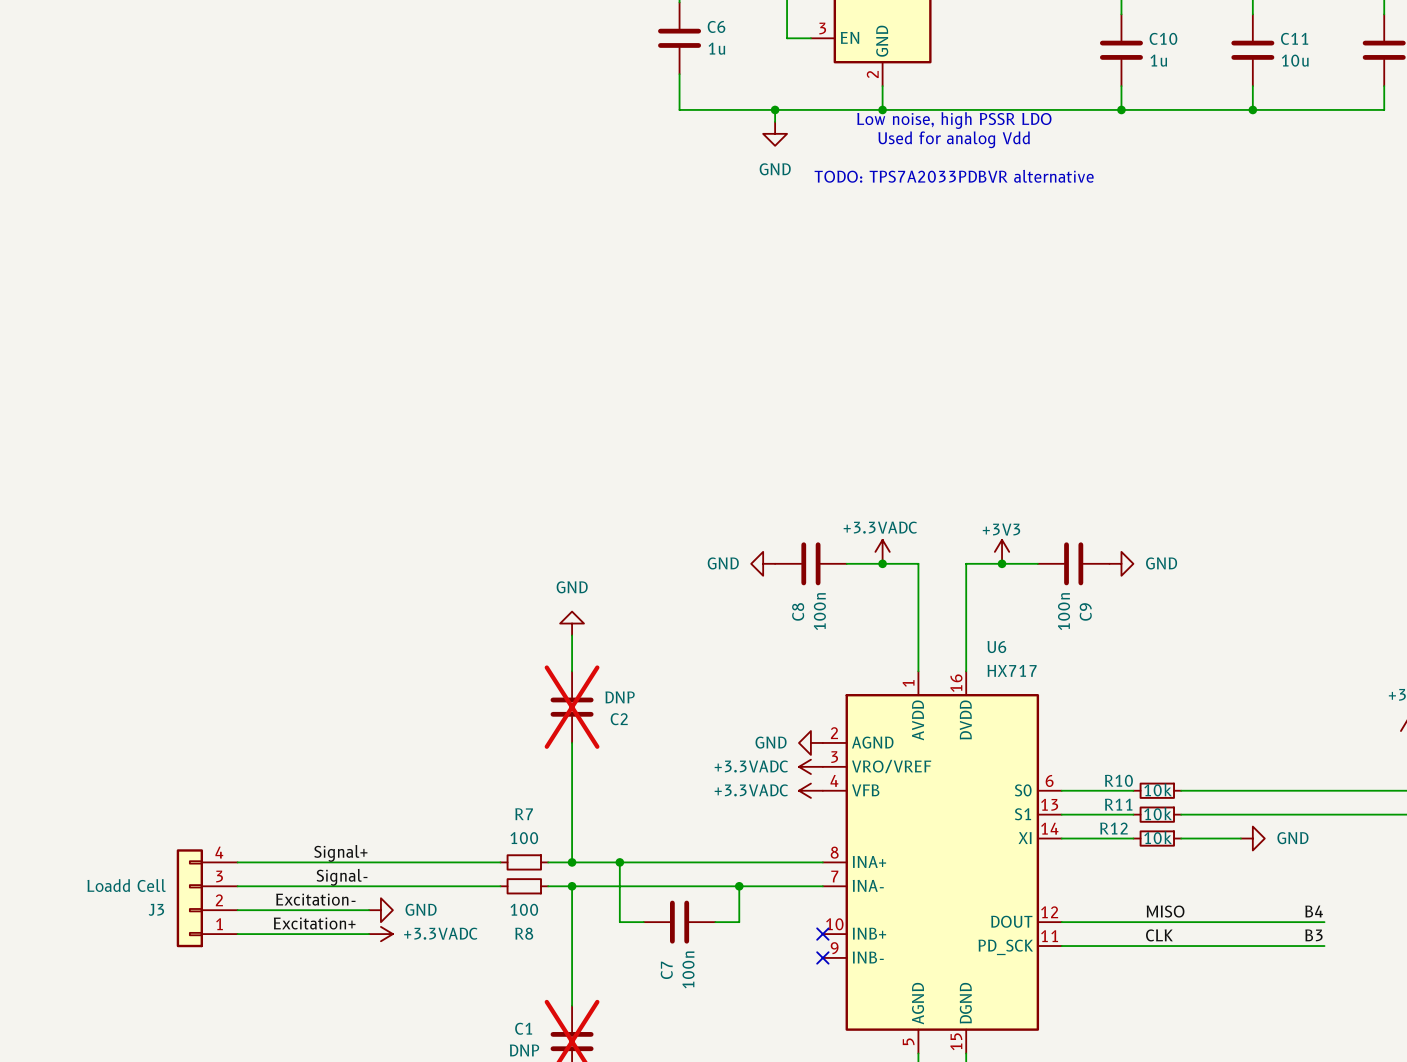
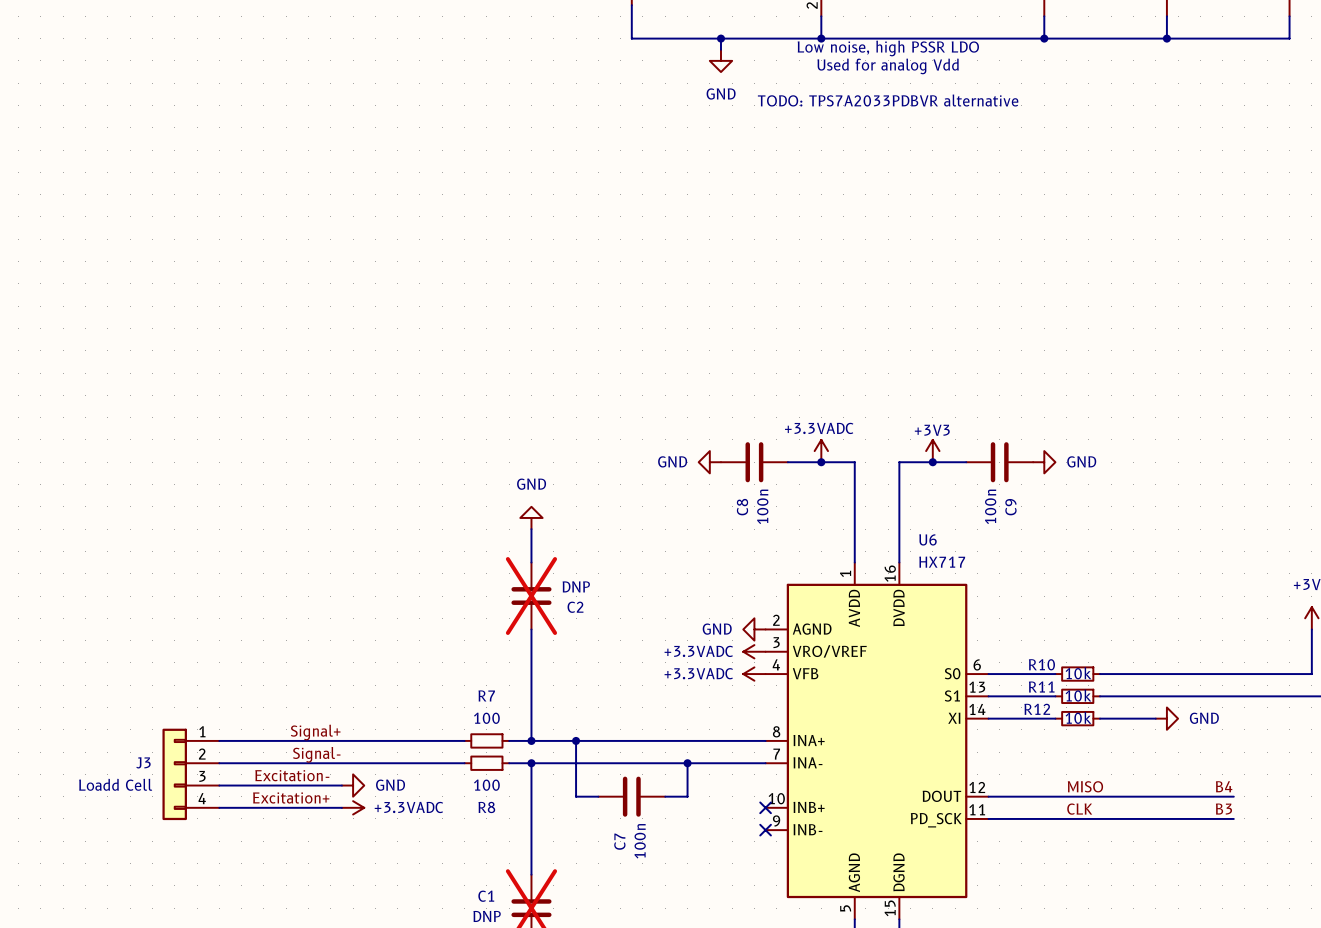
J3 flip: as is (189, 898) -> up-down (174, 774)

